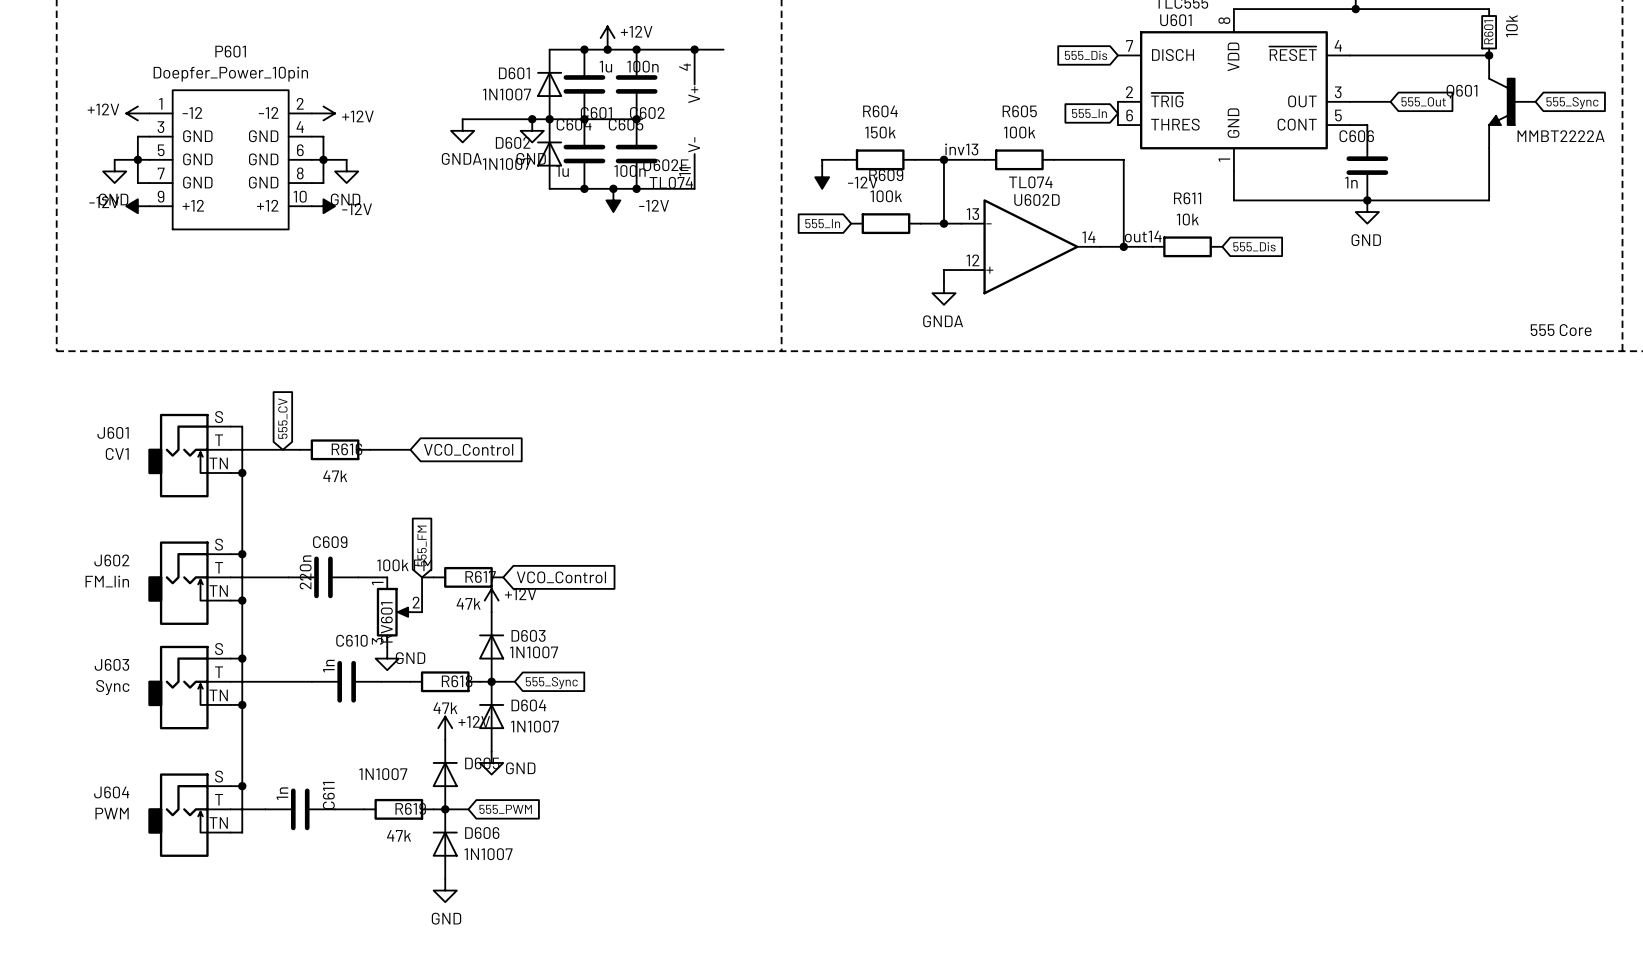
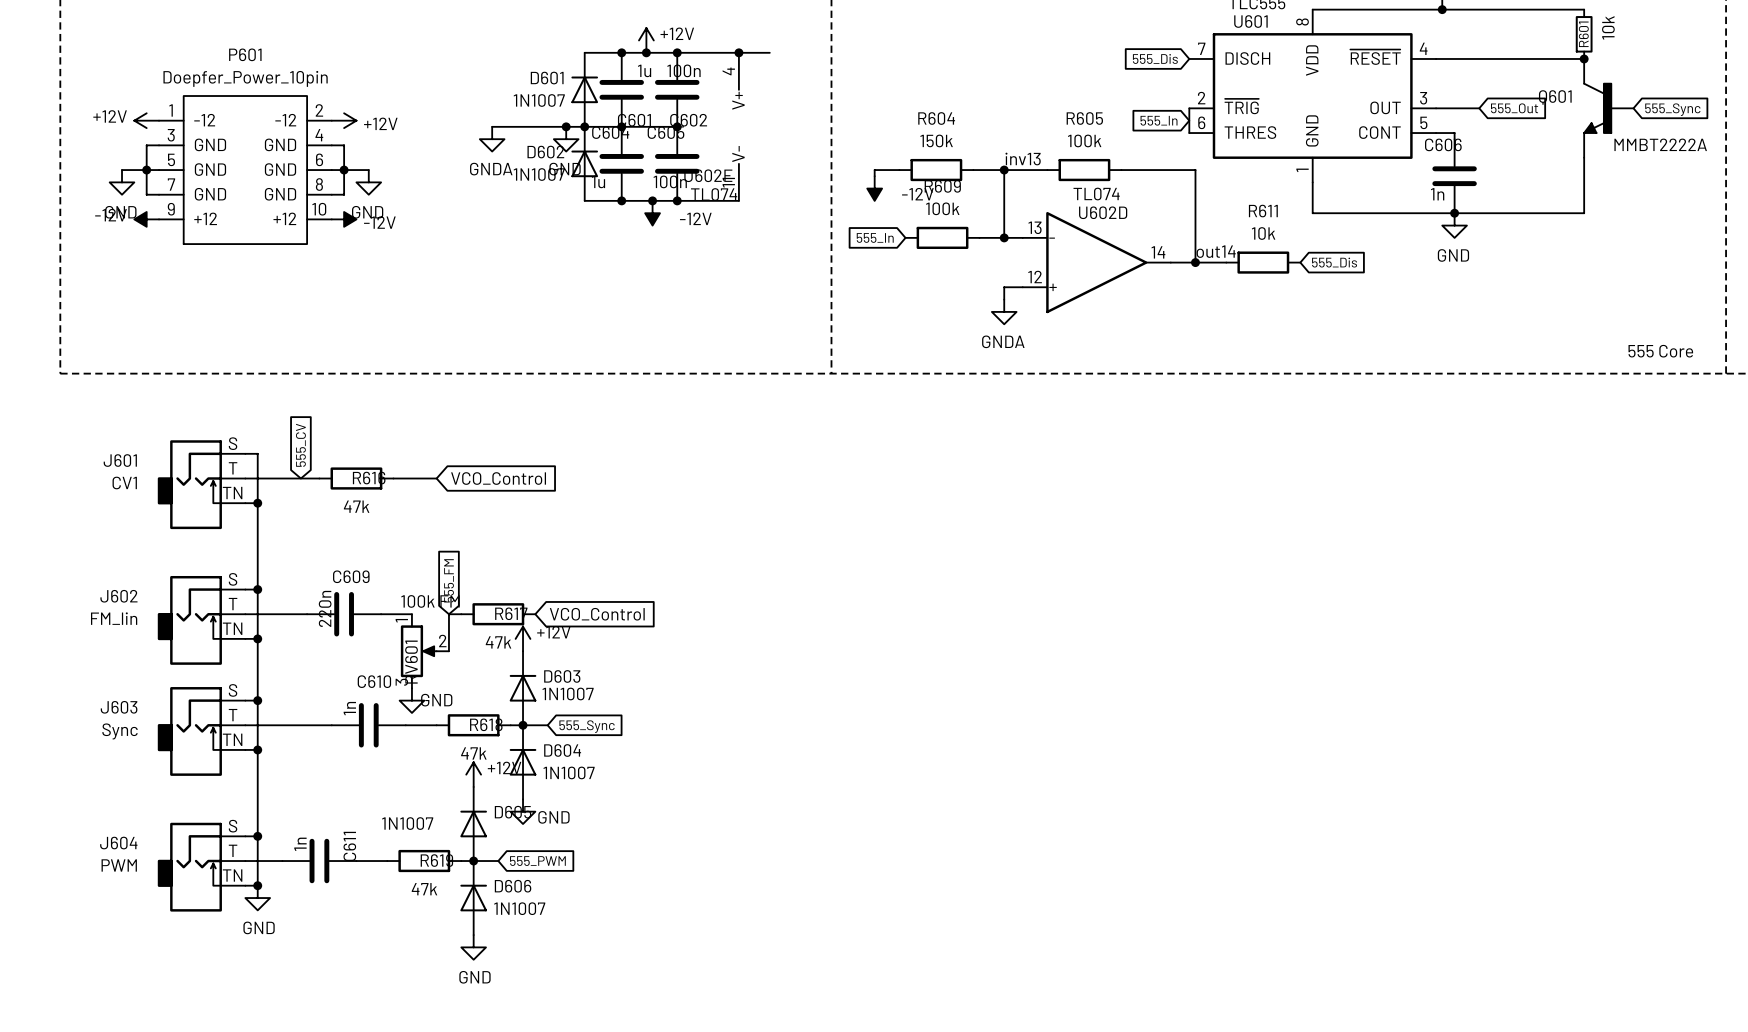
junction: none -> (257, 885)
power symbol: none -> GND (257, 898)

